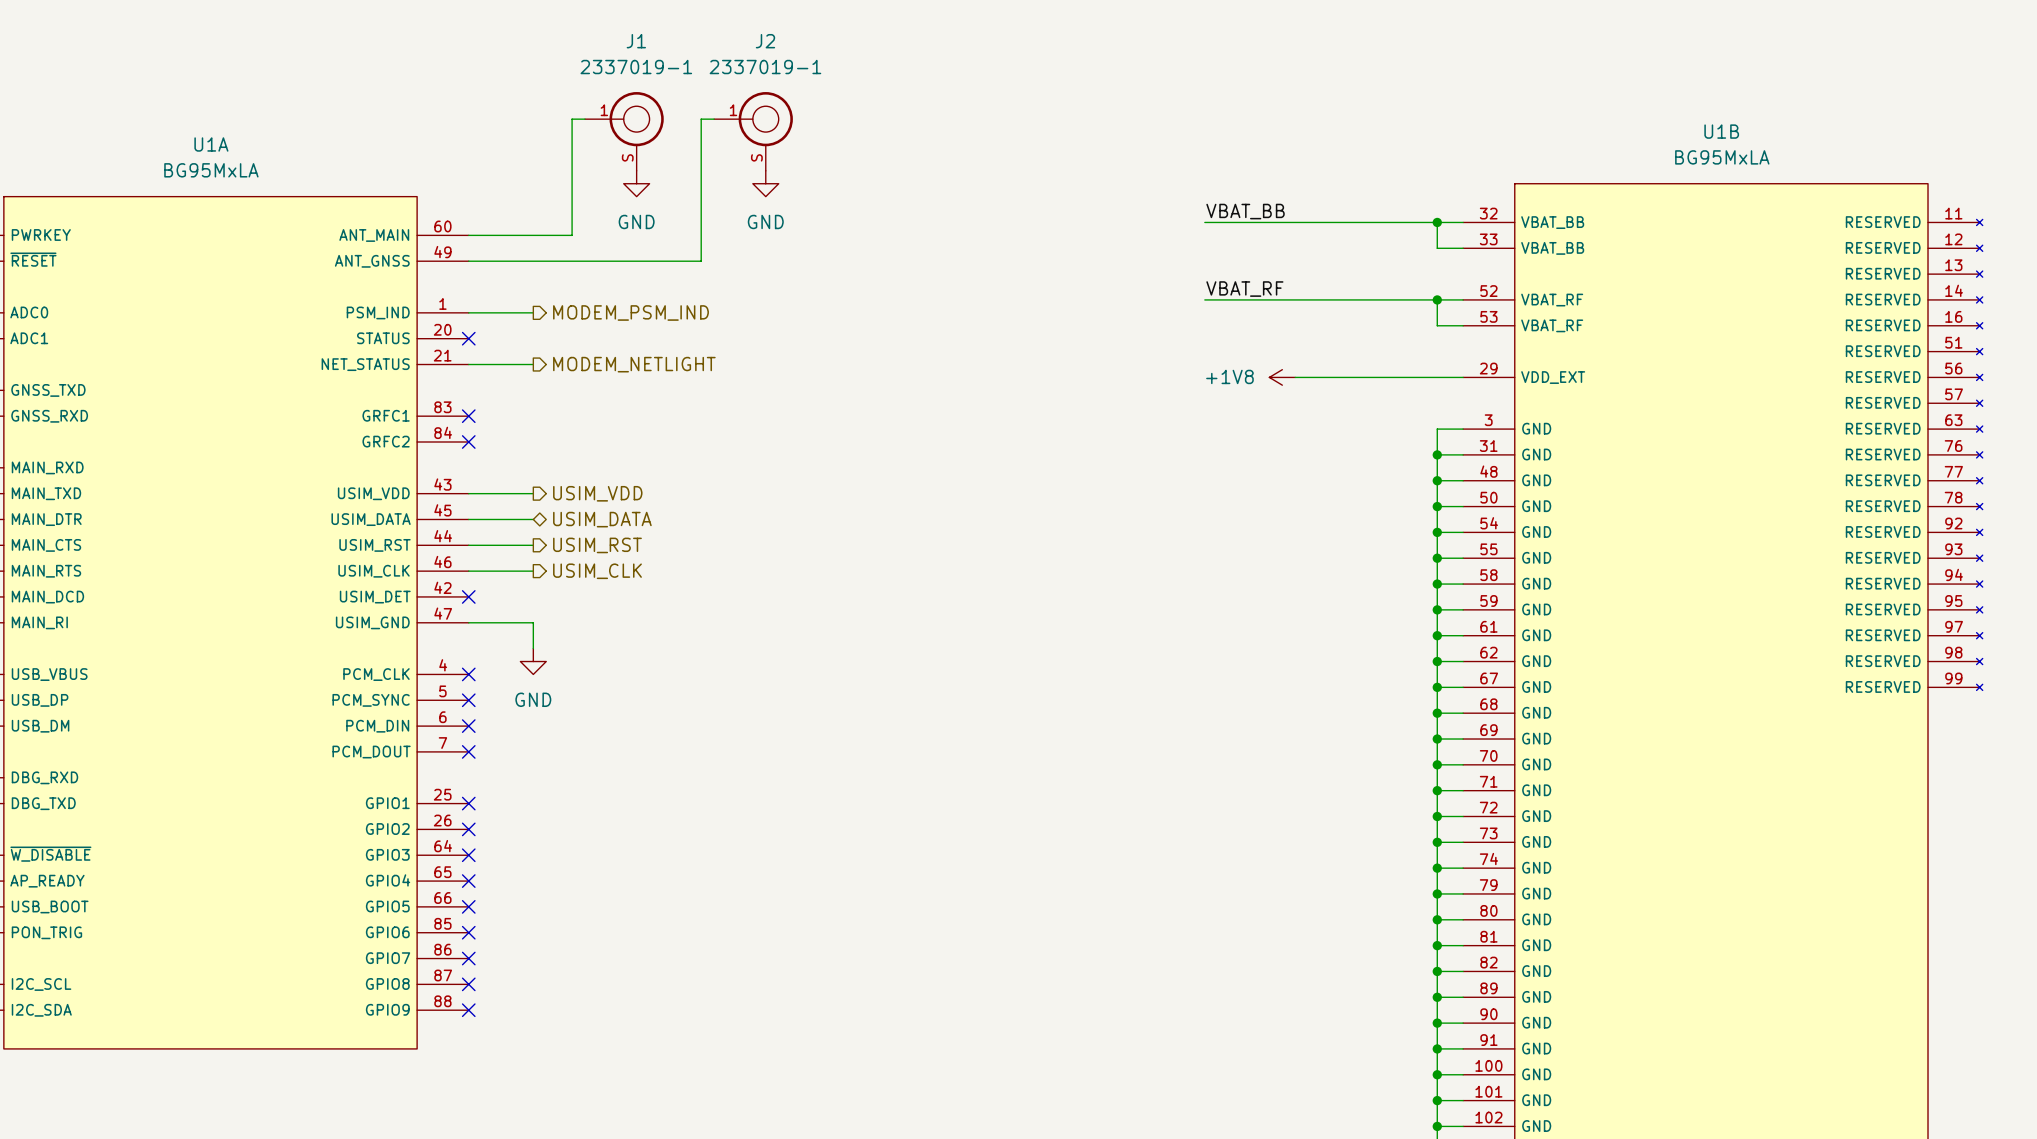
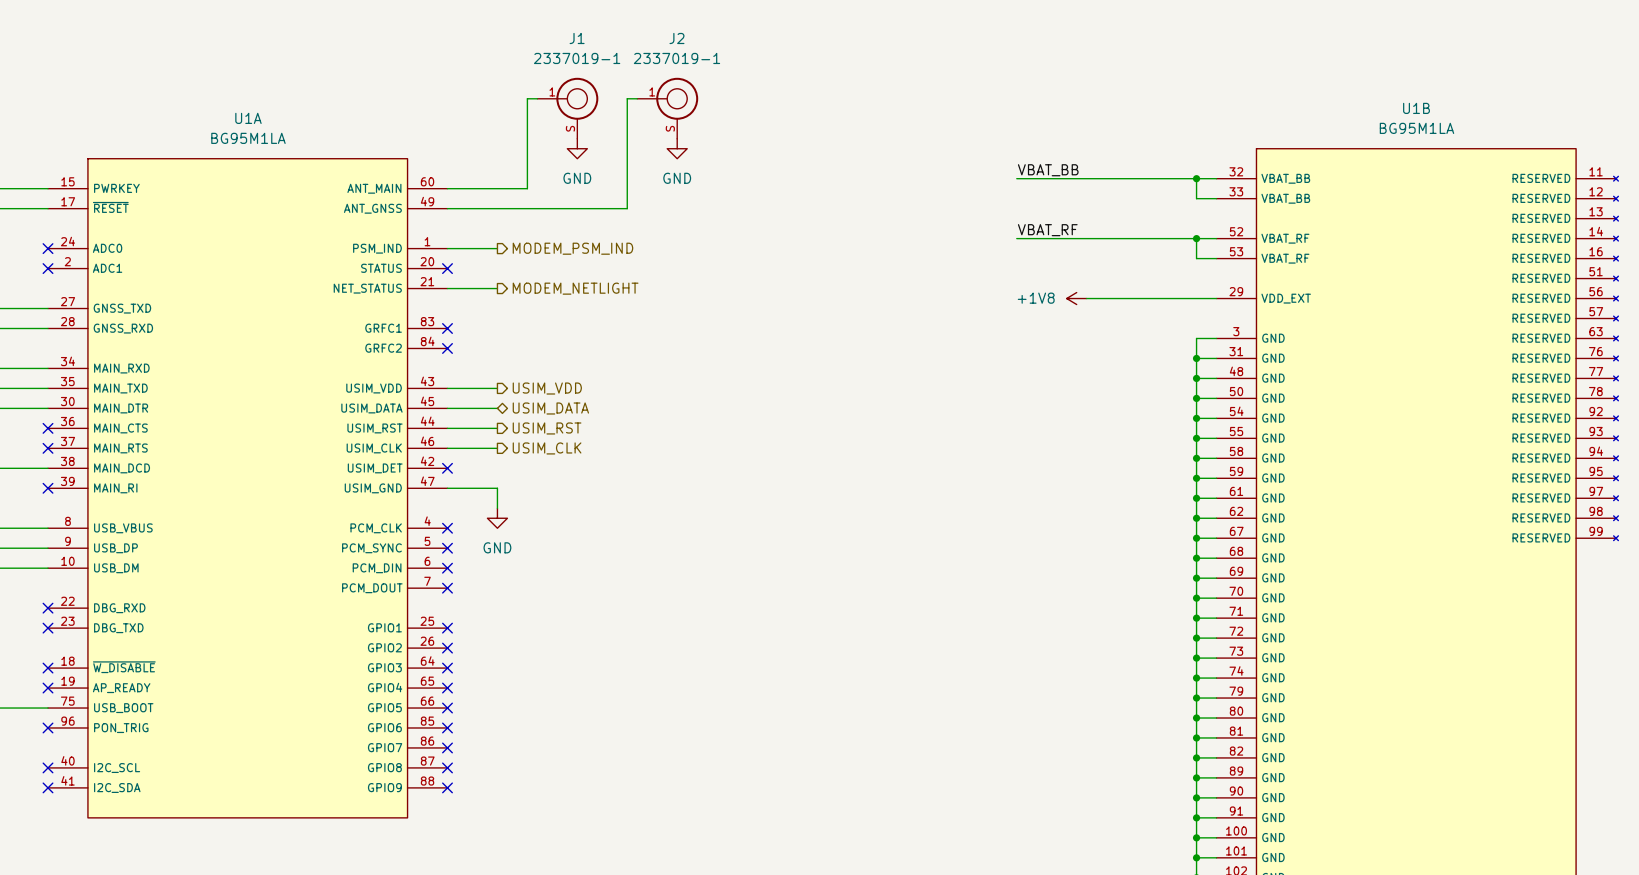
U1B value: BG95MxLA (1722, 157) -> BG95M1LA (1416, 128)
U1A value: BG95MxLA (211, 170) -> BG95M1LA (248, 138)

